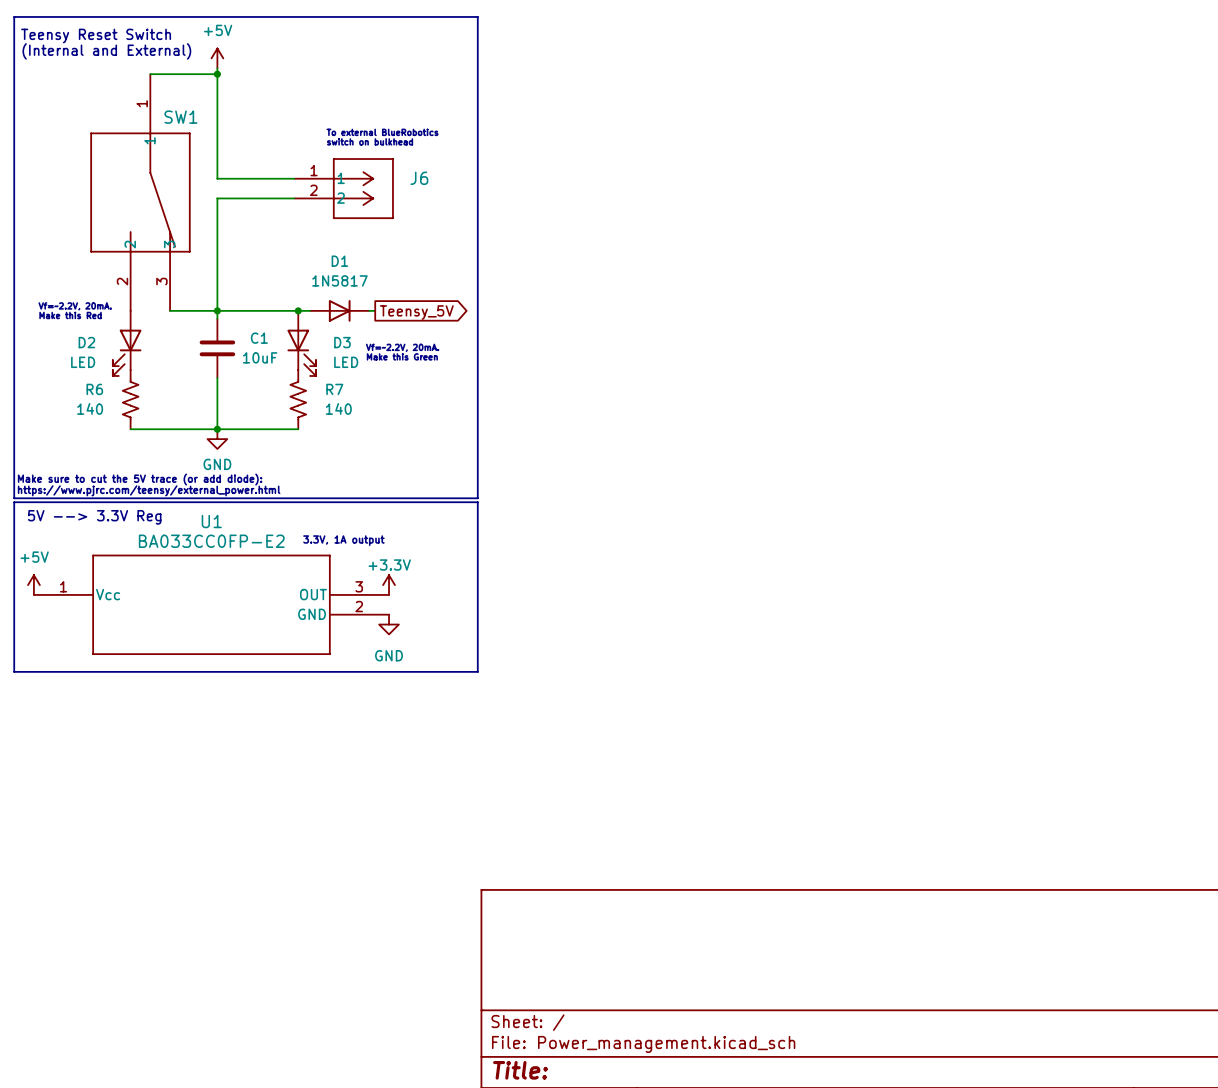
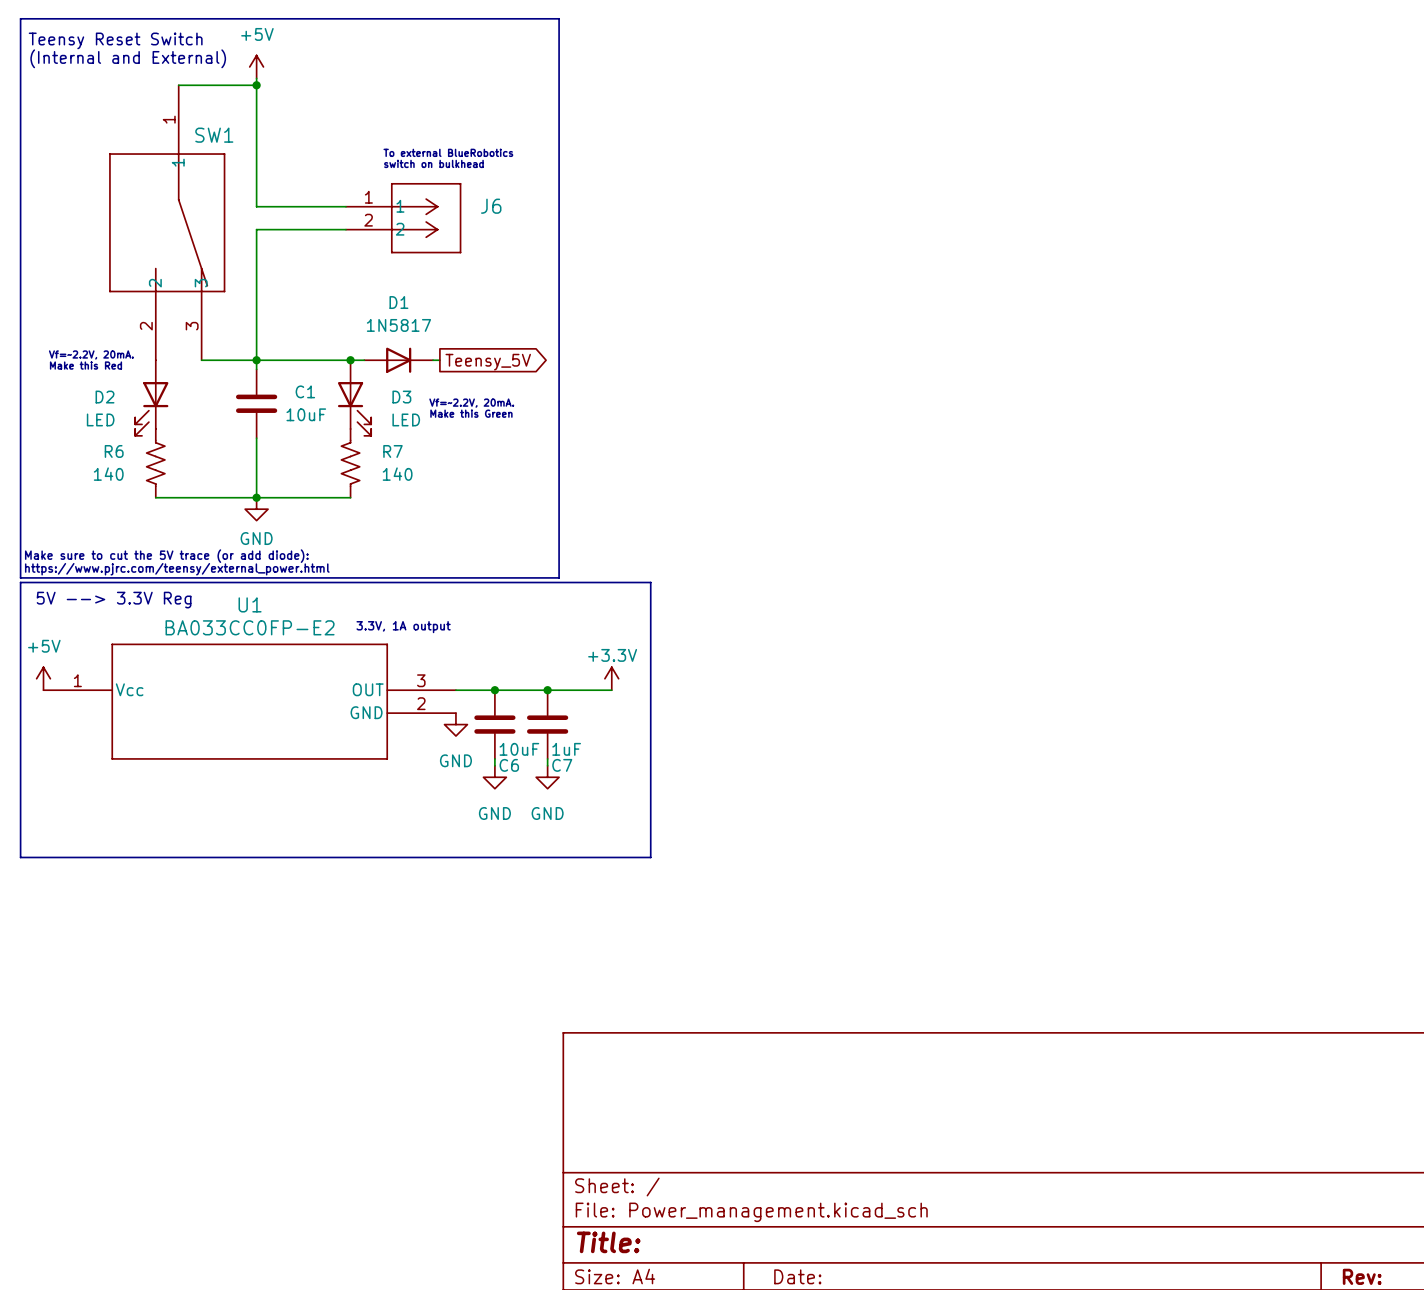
line: (477, 502) (477, 671) (14, 671) -> (559, 582) (650, 582) (650, 857) (20, 857) (20, 779)
power symbol position: +3.3V (389, 585) -> +3.3V (611, 678)
wire: none -> (455, 690) (611, 690)
junction: none -> (494, 690)
junction: none -> (547, 690)
C6: none -> 10uF (494, 724)
C7: none -> 1uF (547, 724)
wire: none -> (494, 758) (494, 765)
wire: none -> (547, 758) (547, 765)
power symbol: none -> GND (494, 777)
power symbol: none -> GND (547, 777)

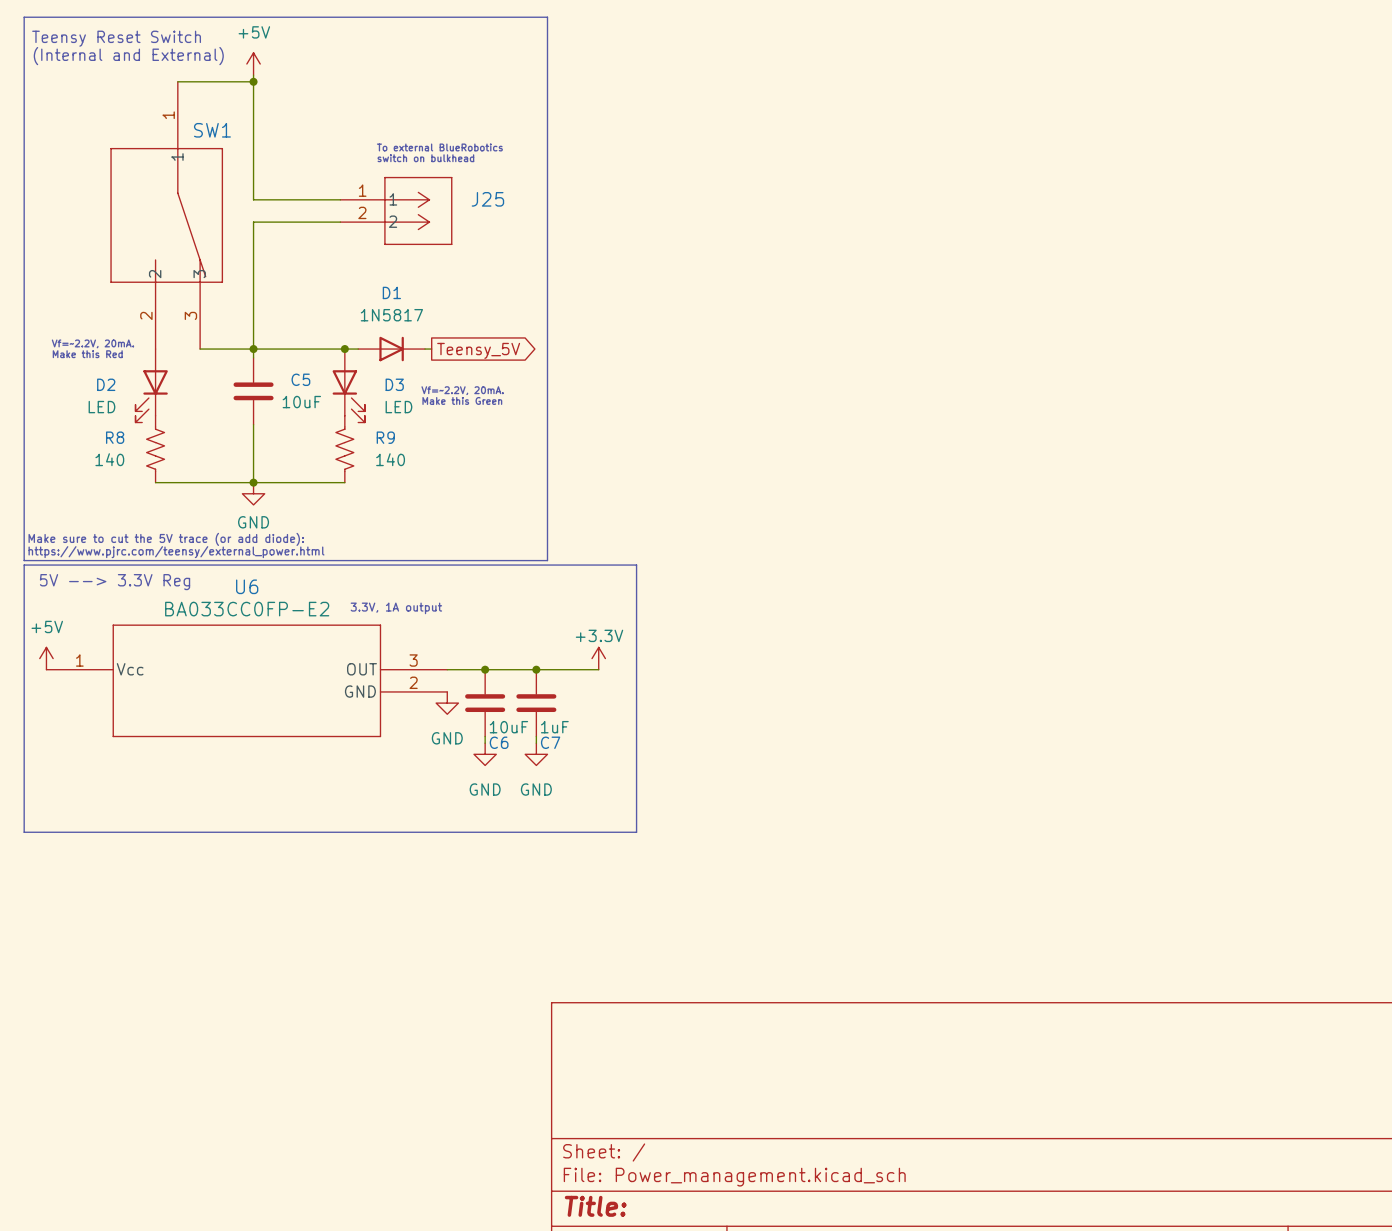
J6 name: J6 (491, 206) -> J25 (487, 199)
C1 name: C1 (305, 391) -> C5 (300, 379)
R6 name: R6 (114, 451) -> R8 (115, 437)
R7 name: R7 (392, 451) -> R9 (385, 437)
U1 name: U1 (250, 604) -> U6 (247, 586)

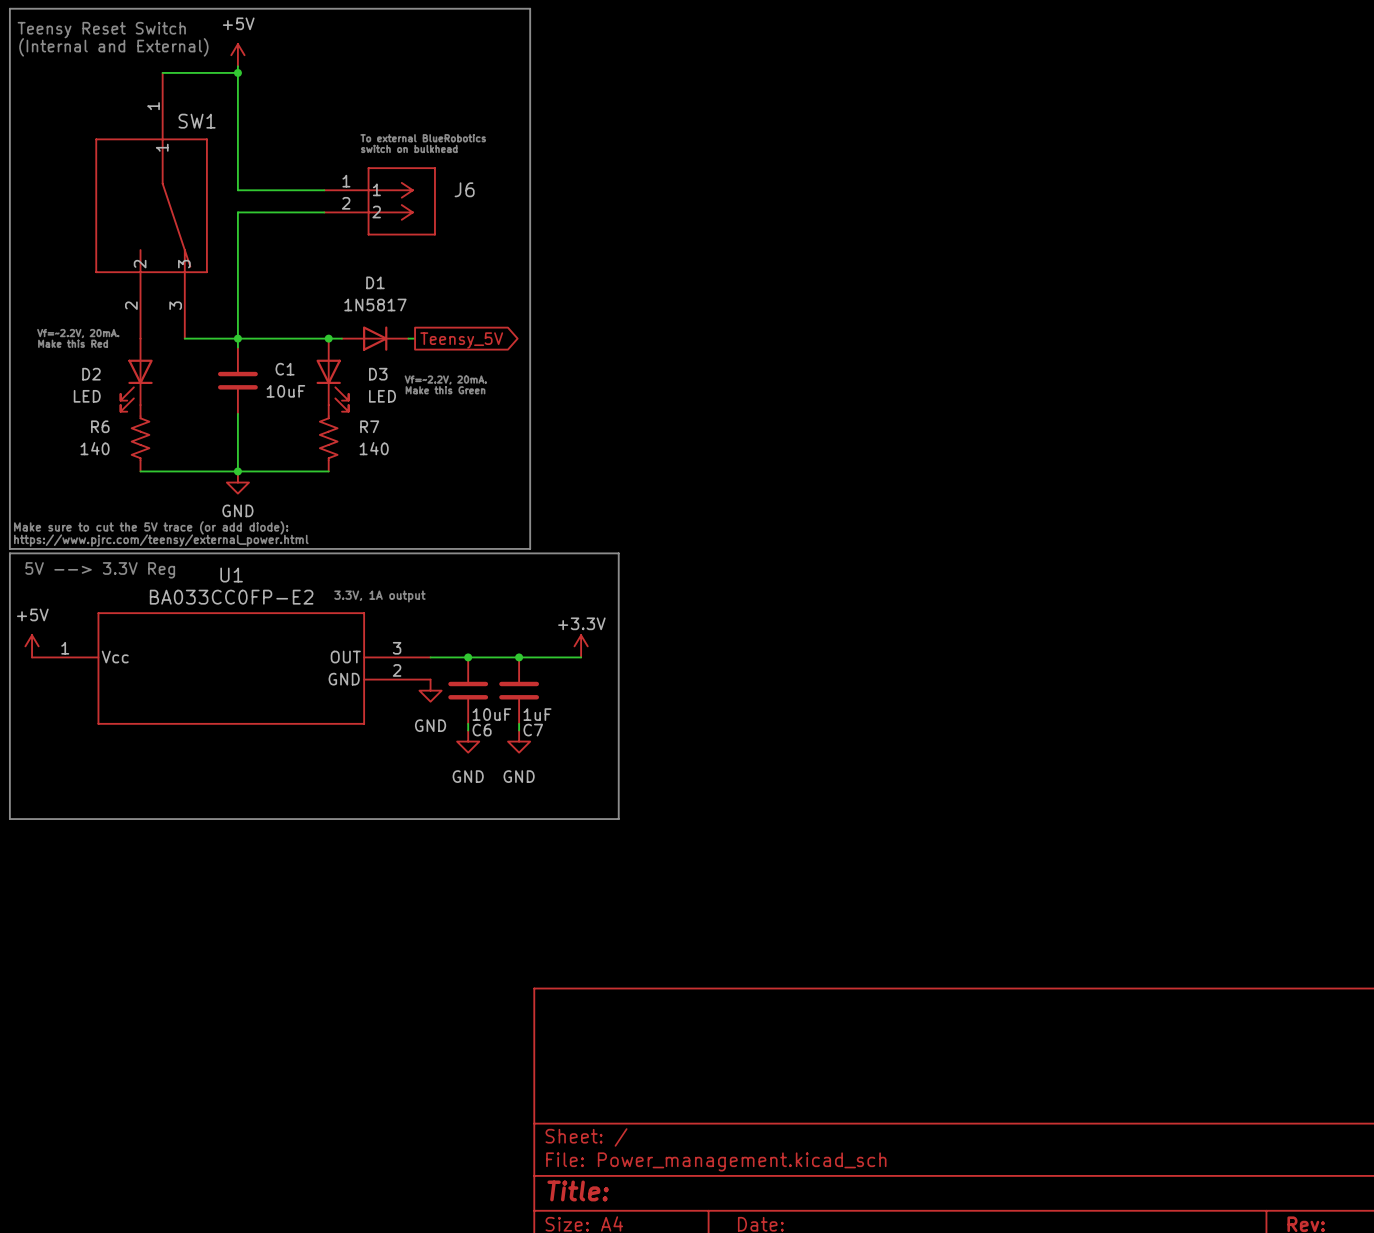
J25 name: J25 (487, 199) -> J6 (464, 189)
C5 name: C5 (300, 379) -> C1 (285, 369)
R8 name: R8 (115, 437) -> R6 (100, 426)
R9 name: R9 (385, 437) -> R7 (369, 426)
U6 name: U6 (247, 586) -> U1 (231, 575)

